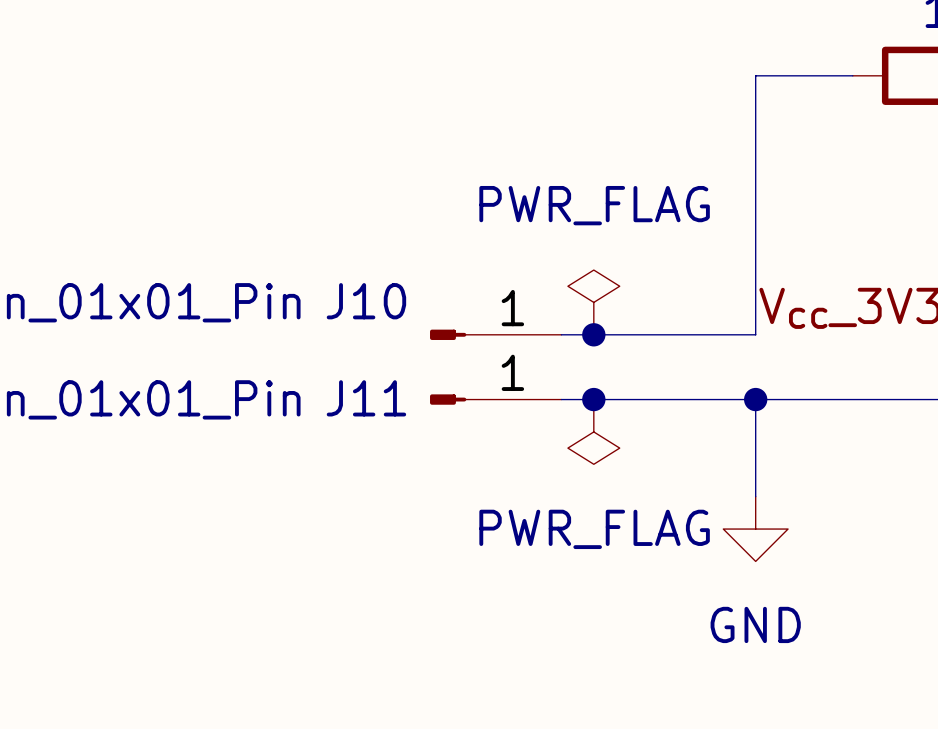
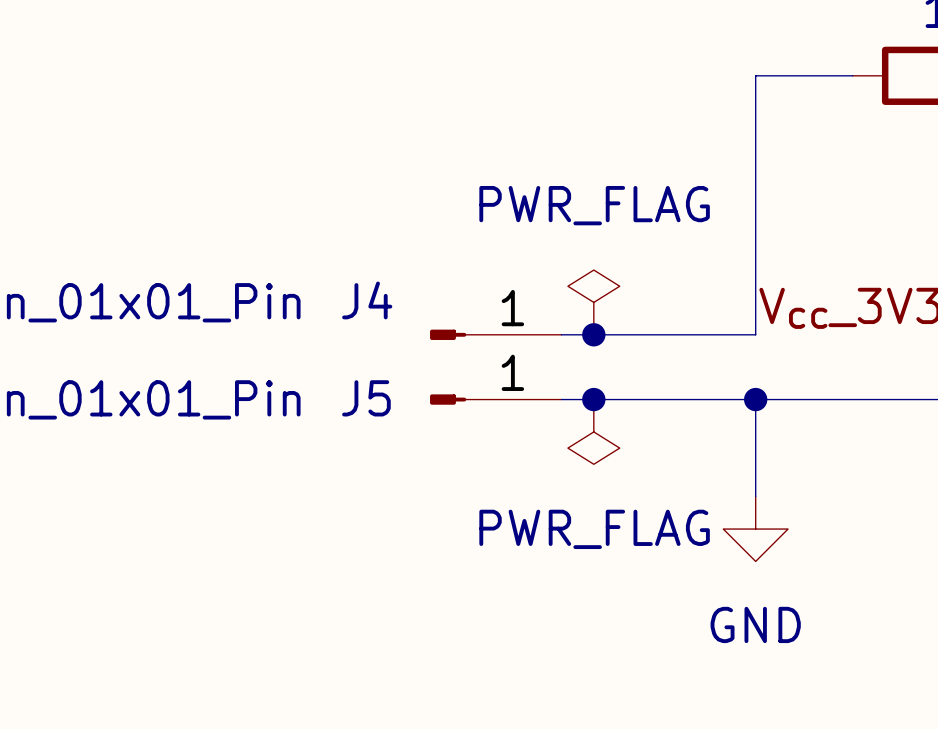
J10 name: J10 (366, 301) -> J4 (367, 300)
J11 name: J11 (366, 398) -> J5 (366, 398)

